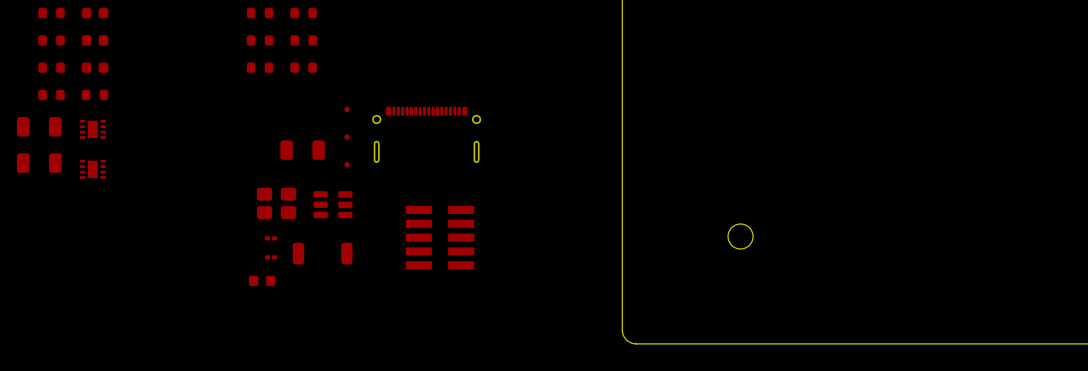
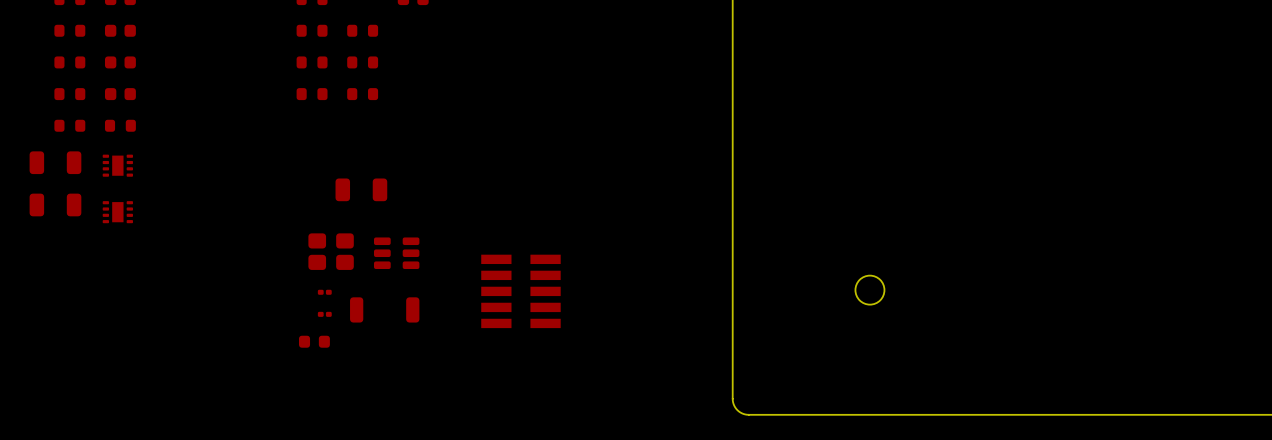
part: (347, 109) -> none
part: (426, 134) -> none
part: (347, 137) -> none
part: (347, 164) -> none

